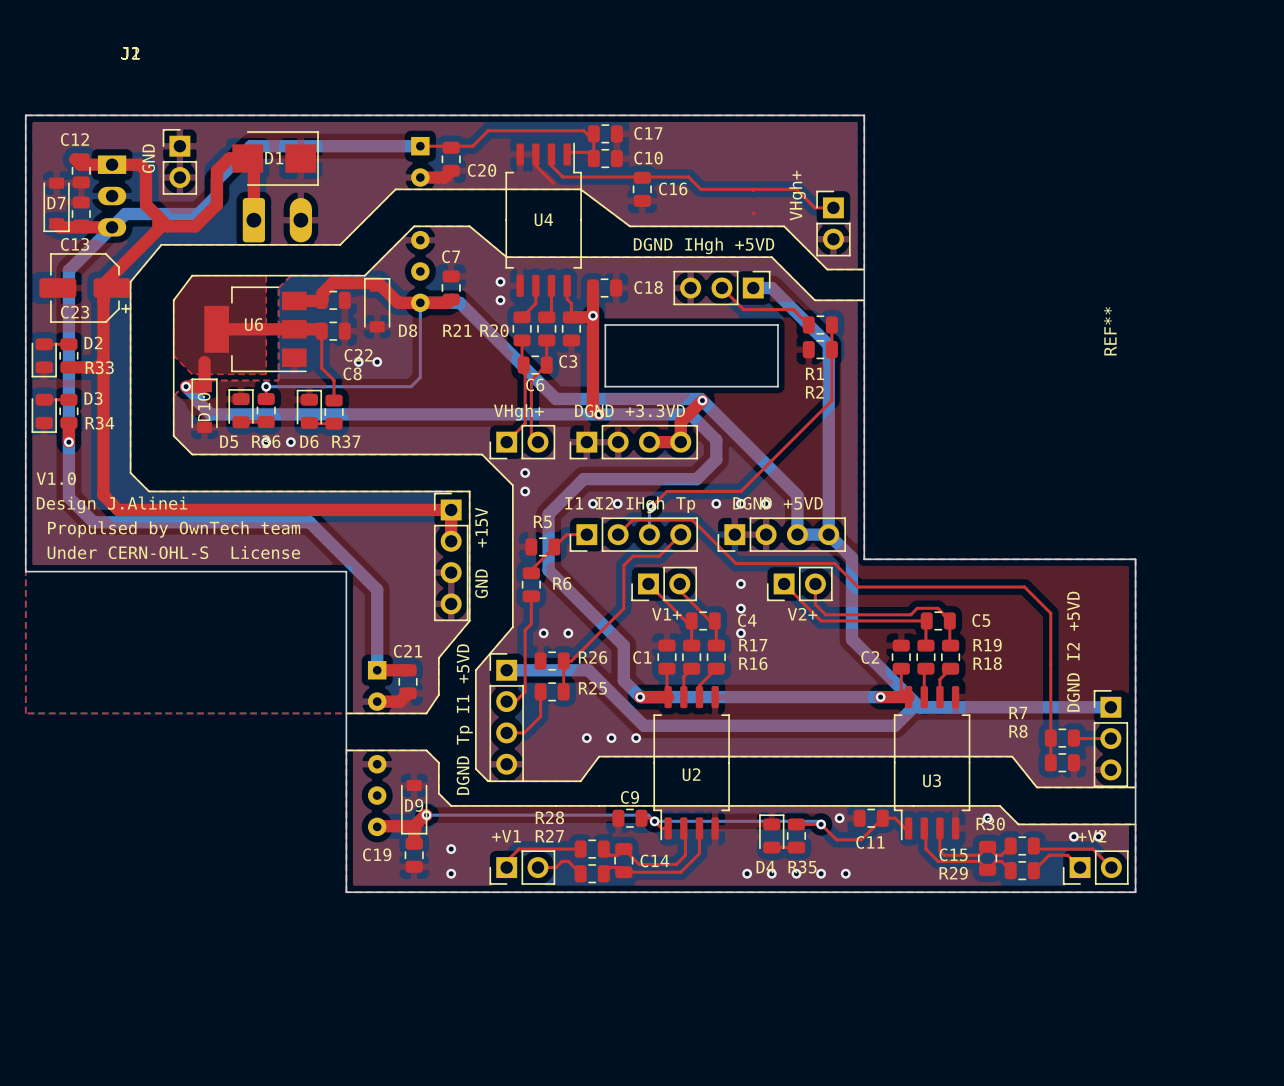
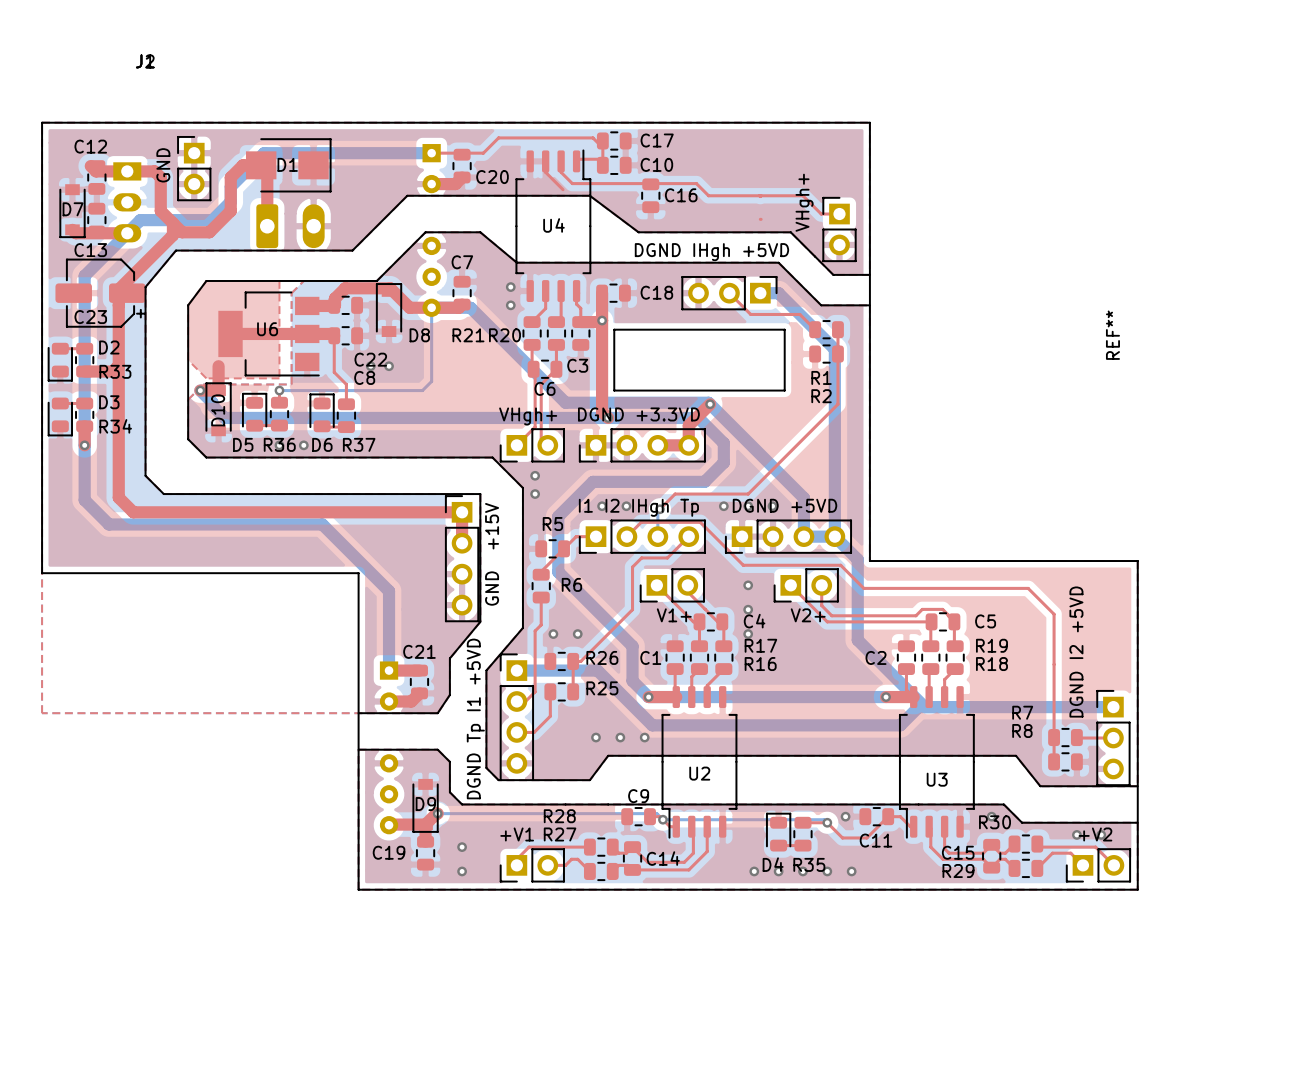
text: V1.0 (56, 478) -> none
text: Design J.Alinei (112, 504) -> none
text: Propulsed by OwnTech team (174, 529) -> none
text: Under CERN-OHL-S License (173, 552) -> none

